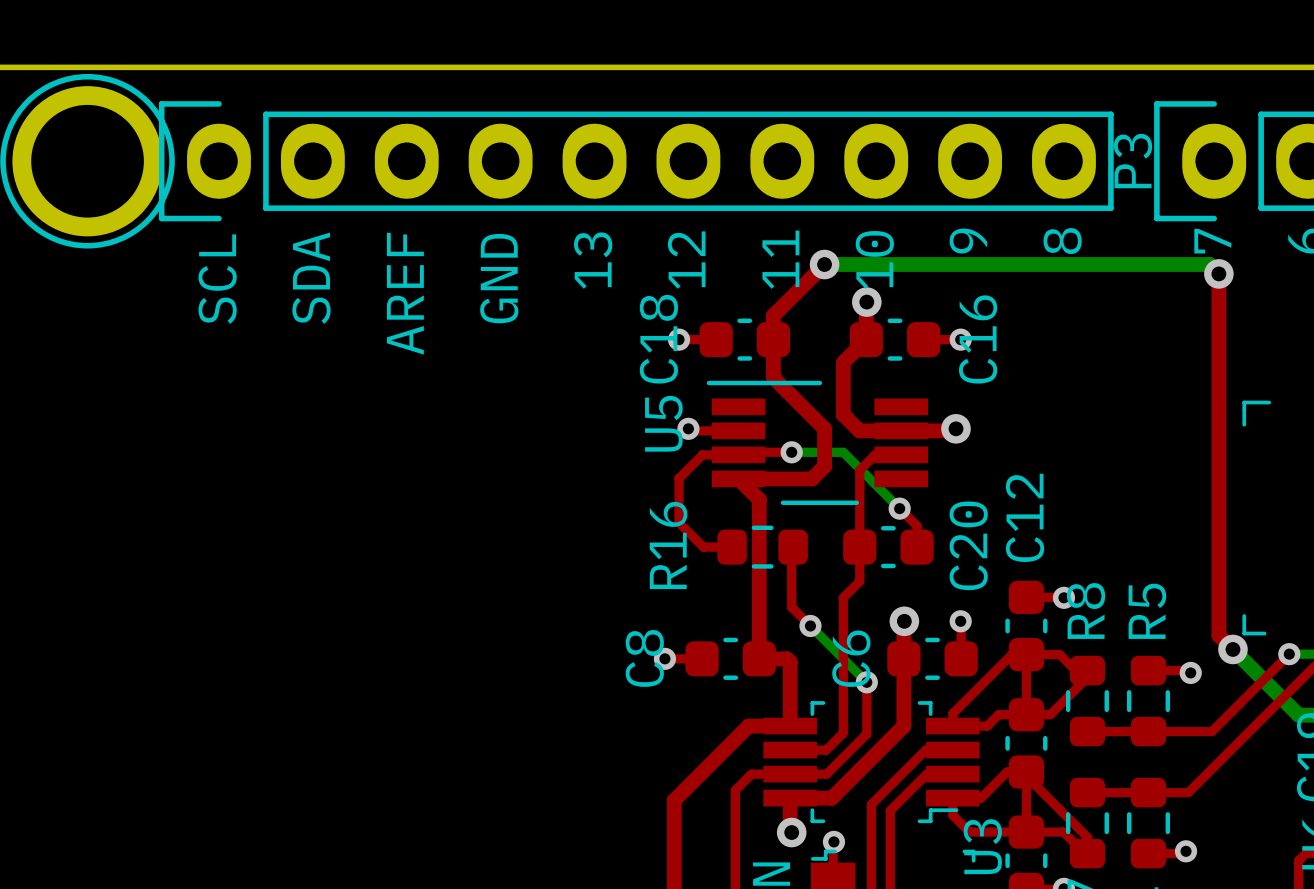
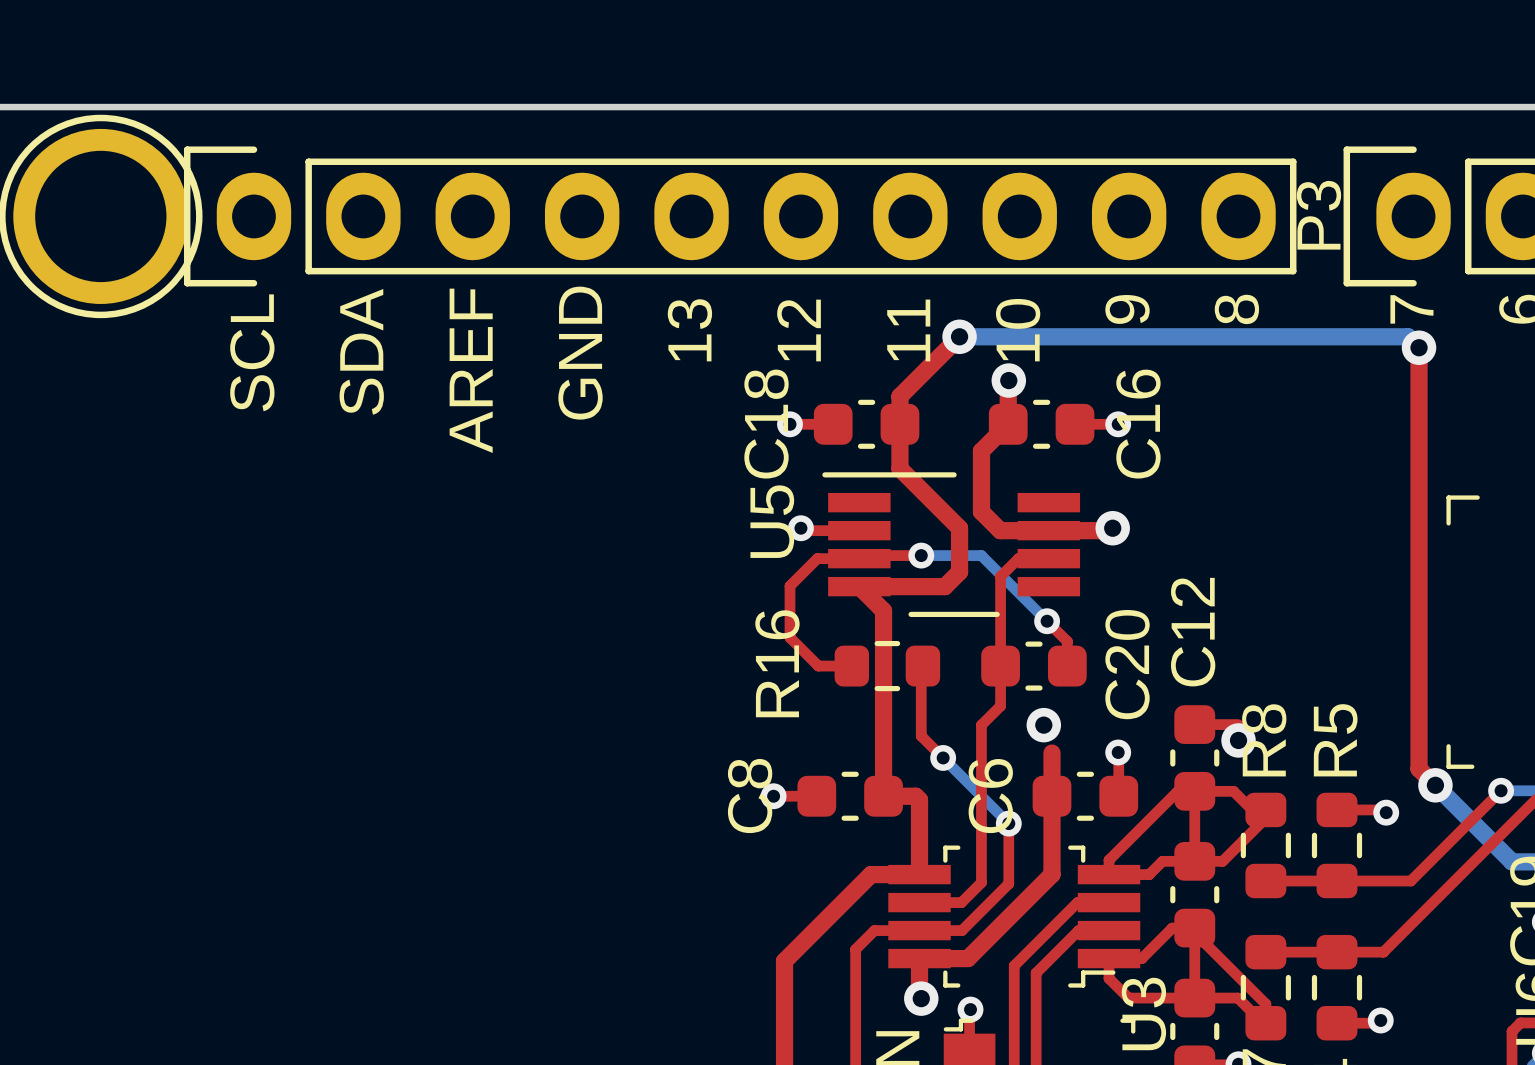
via size: [1052, 586, 1076, 609] -> [1221, 723, 1256, 758]
via position: (904, 621) -> (1043, 725)

